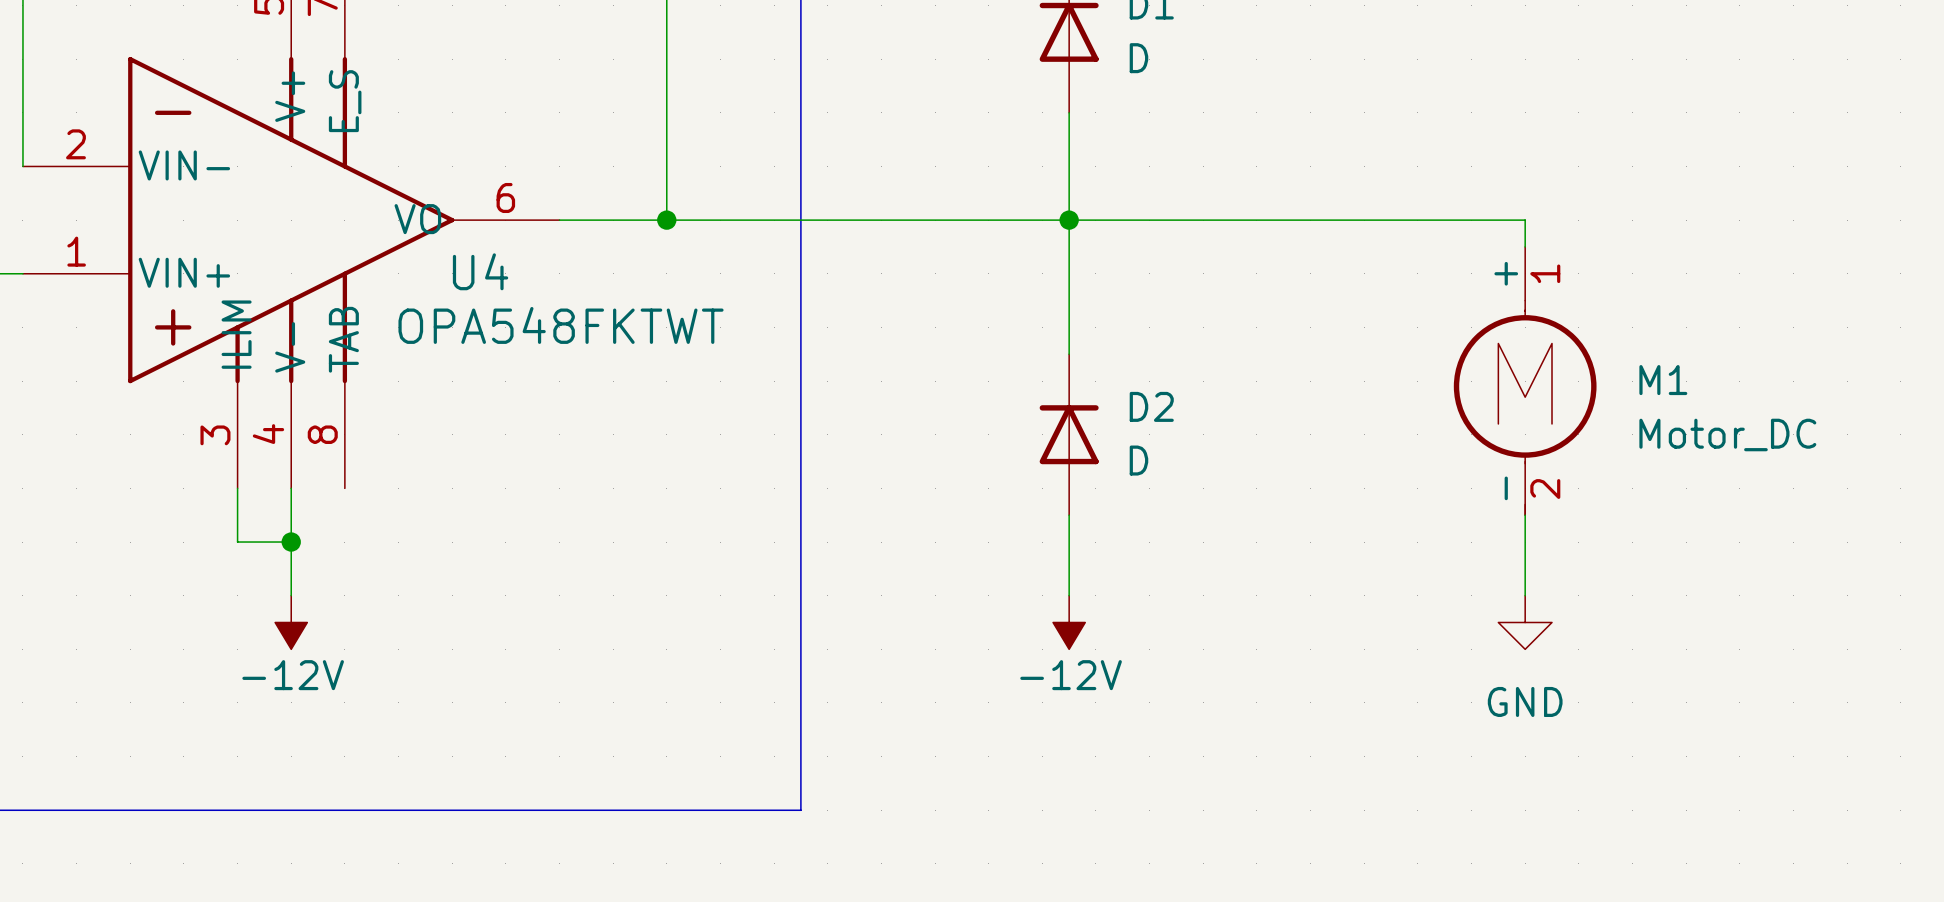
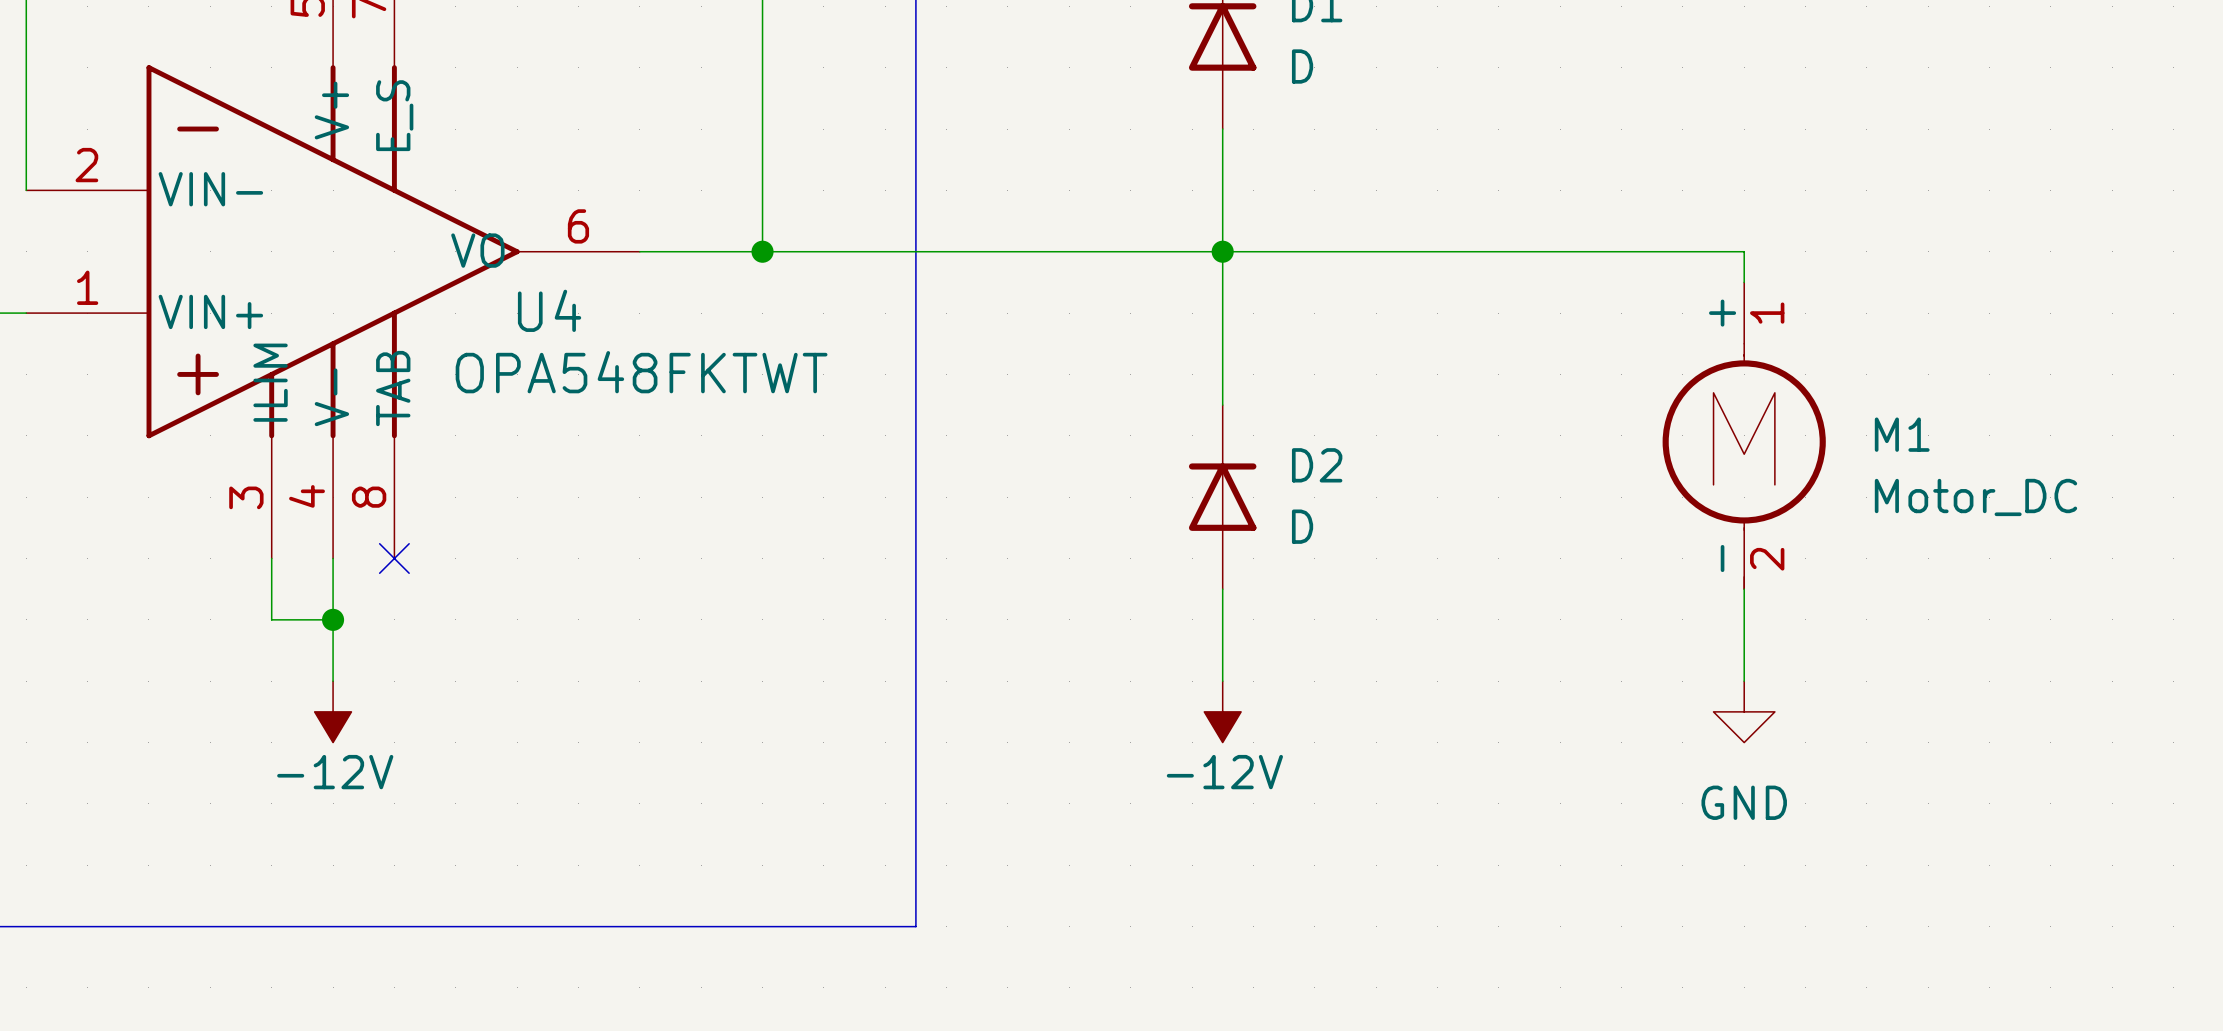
no-connect mark: none -> (394, 558)

